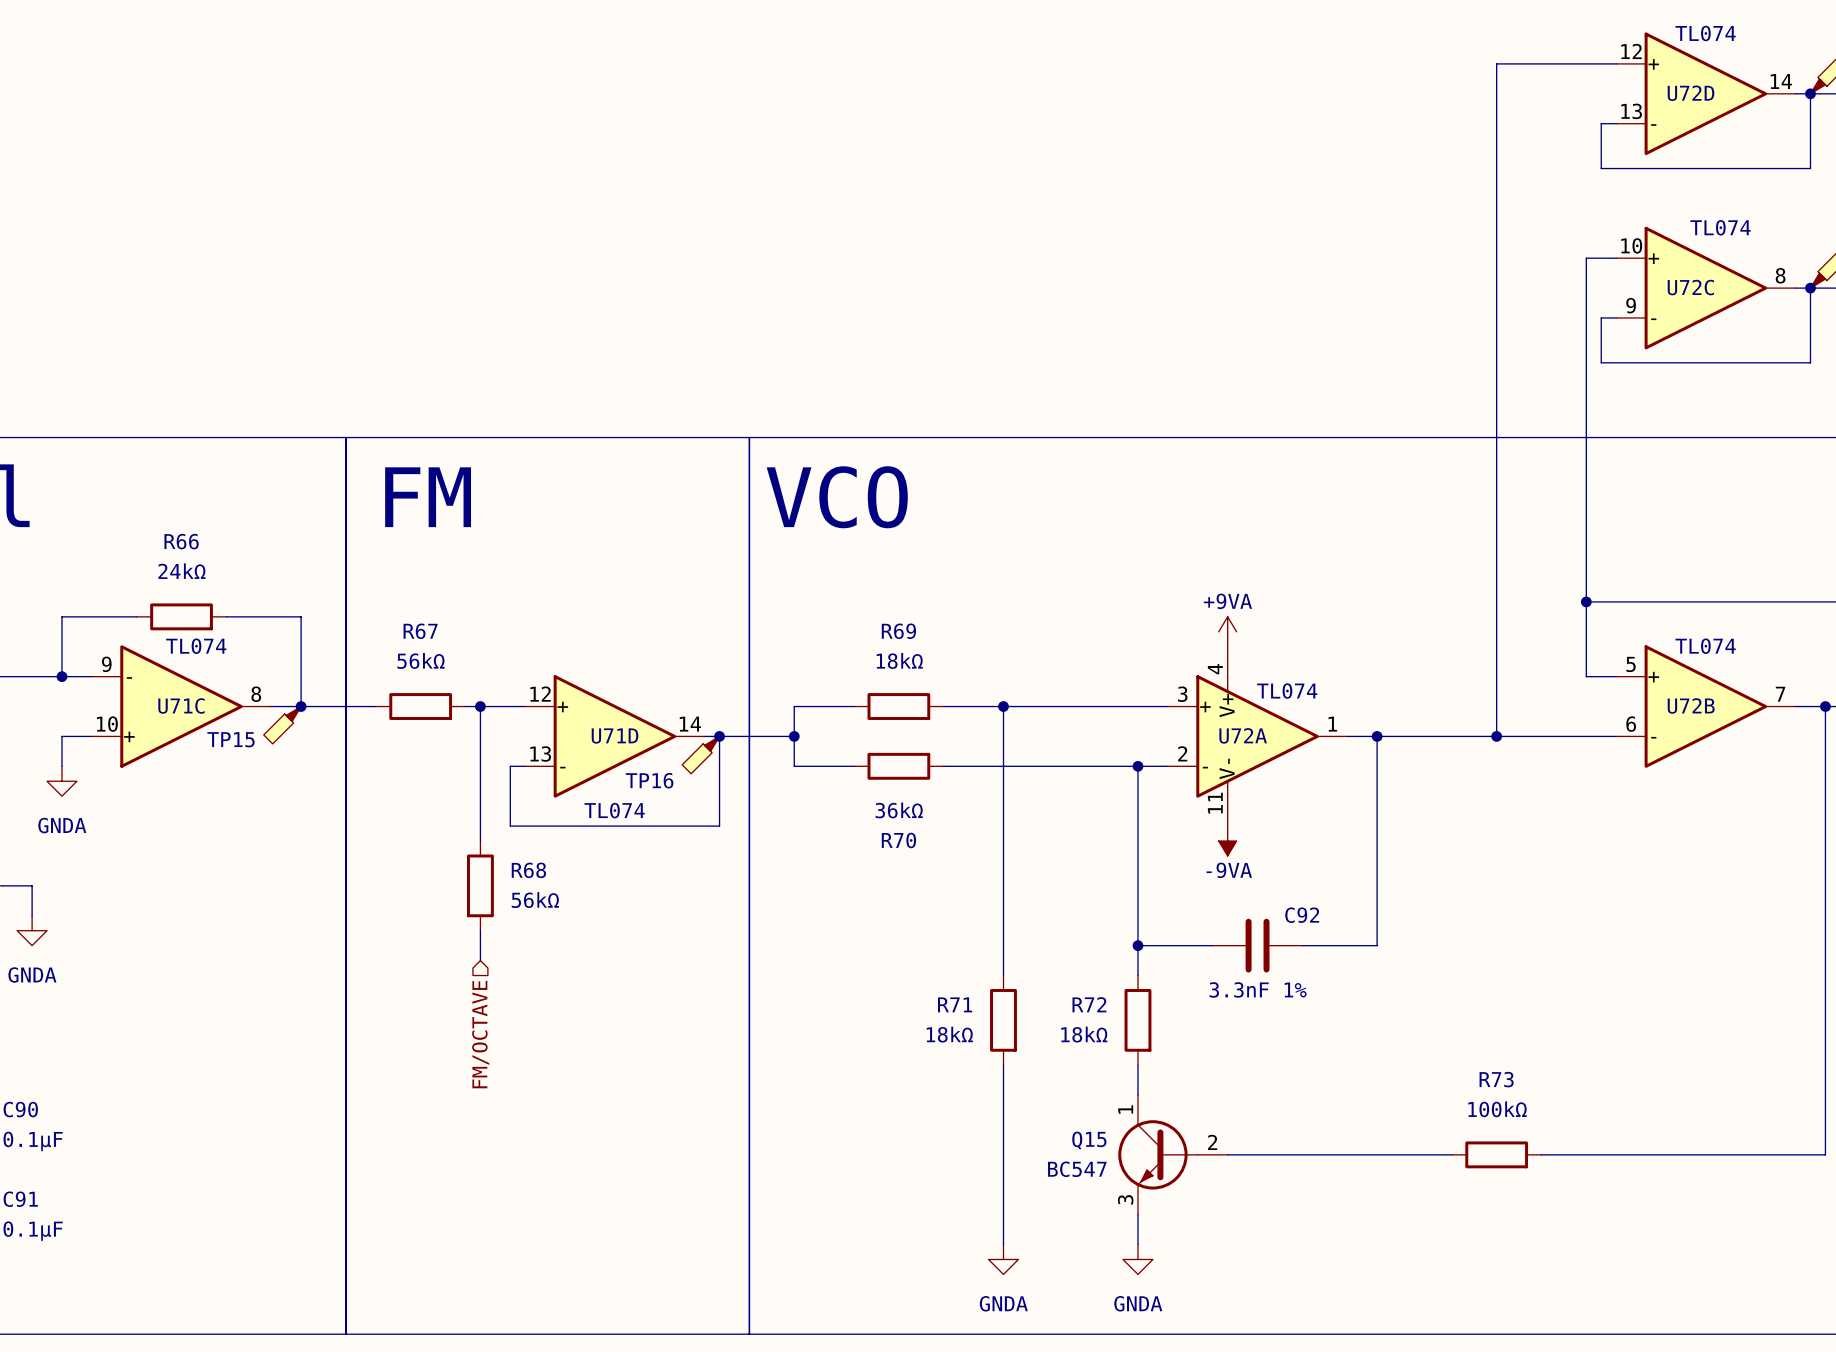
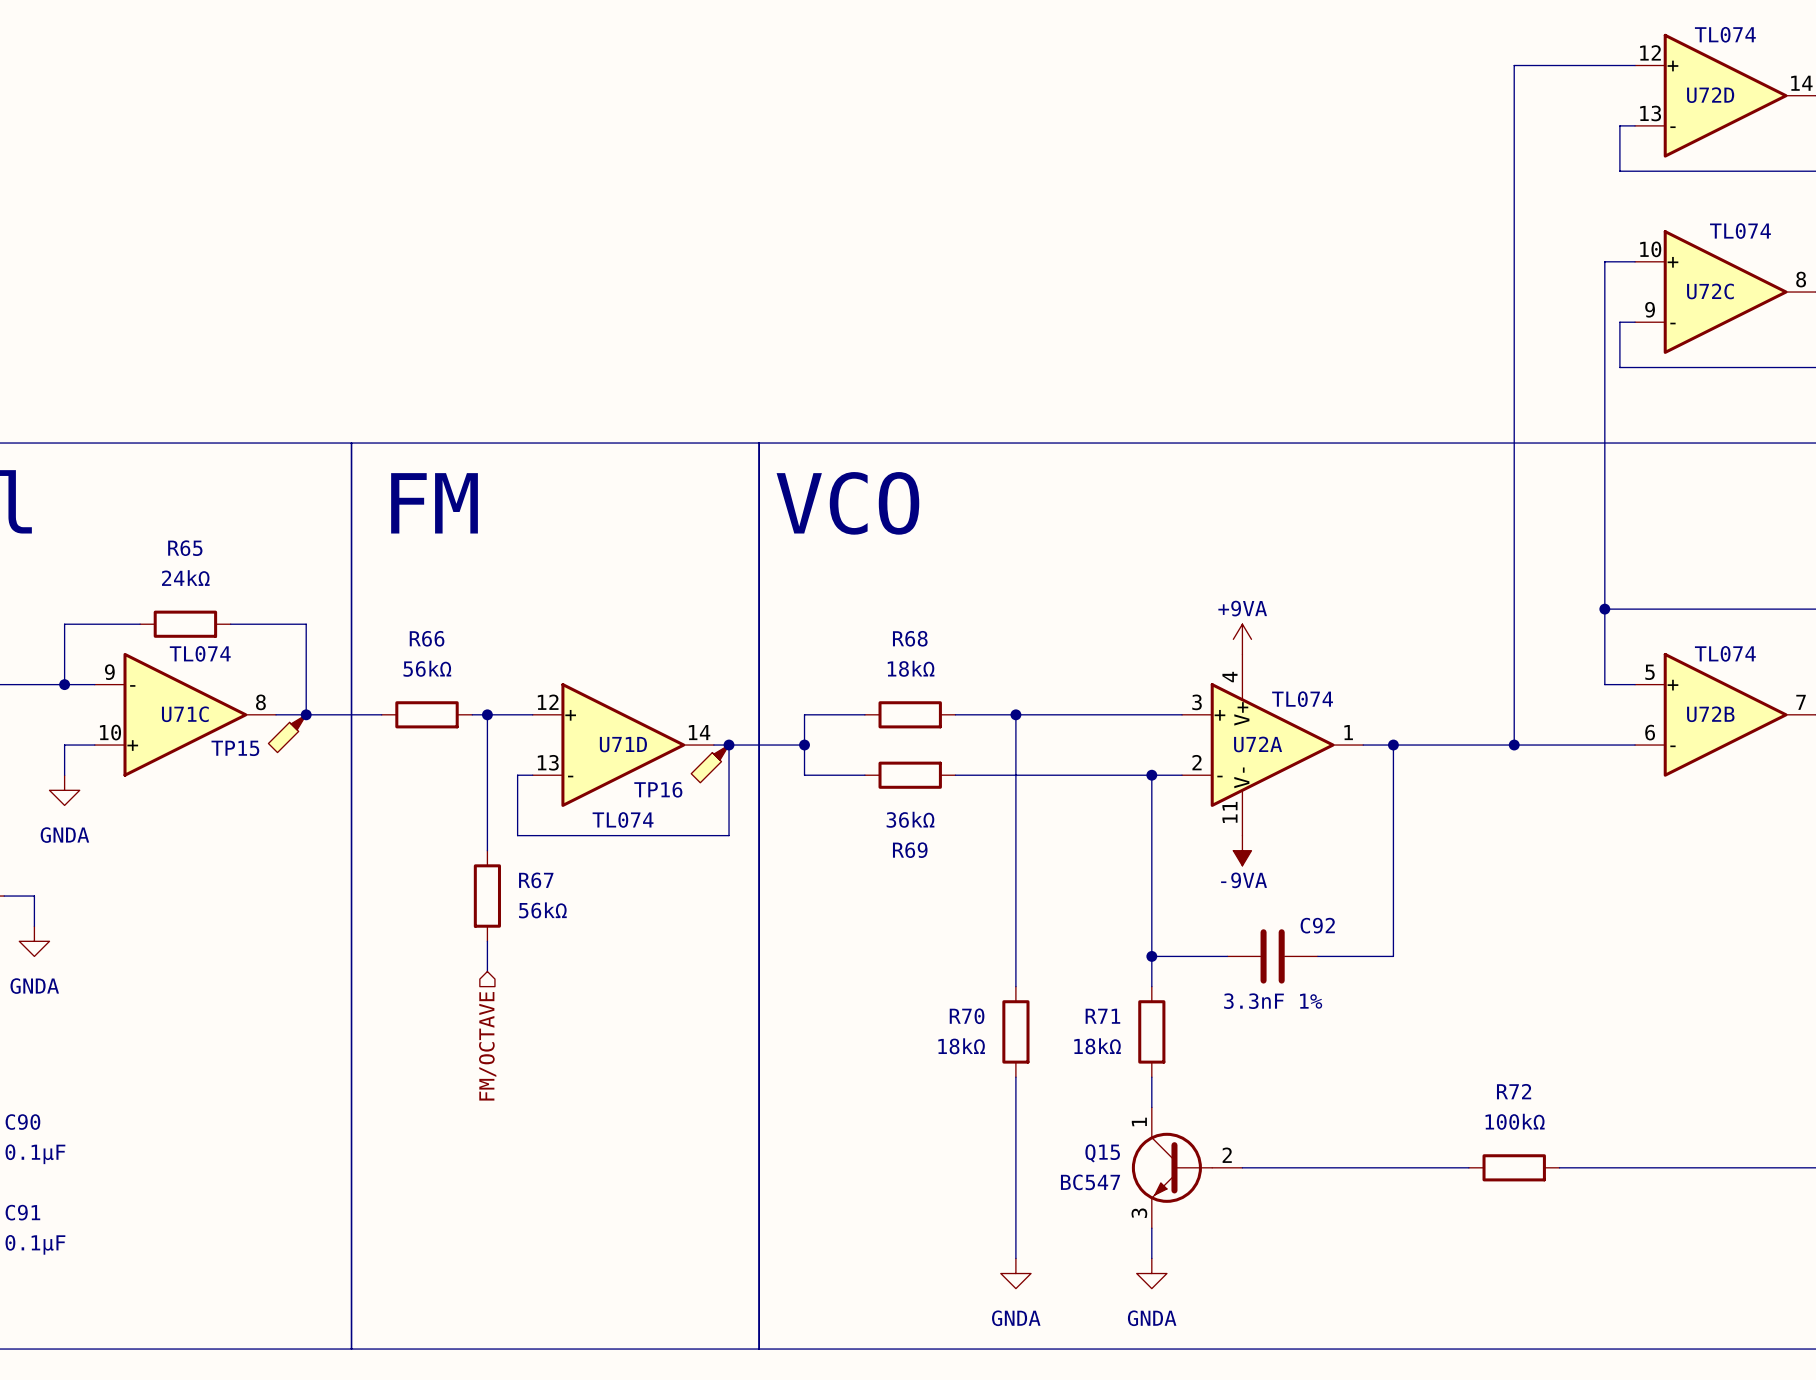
R66 name: R66 (181, 541) -> R65 (185, 548)
R67 name: R67 (420, 631) -> R66 (427, 638)
R69 name: R69 (898, 631) -> R68 (910, 638)
R70 name: R70 (898, 840) -> R69 (910, 850)
R68 name: R68 (528, 870) -> R67 (536, 880)
R71 name: R71 (955, 1004) -> R70 (967, 1016)
R72 name: R72 (1089, 1004) -> R71 (1102, 1016)
R73 name: R73 (1496, 1079) -> R72 (1514, 1091)

